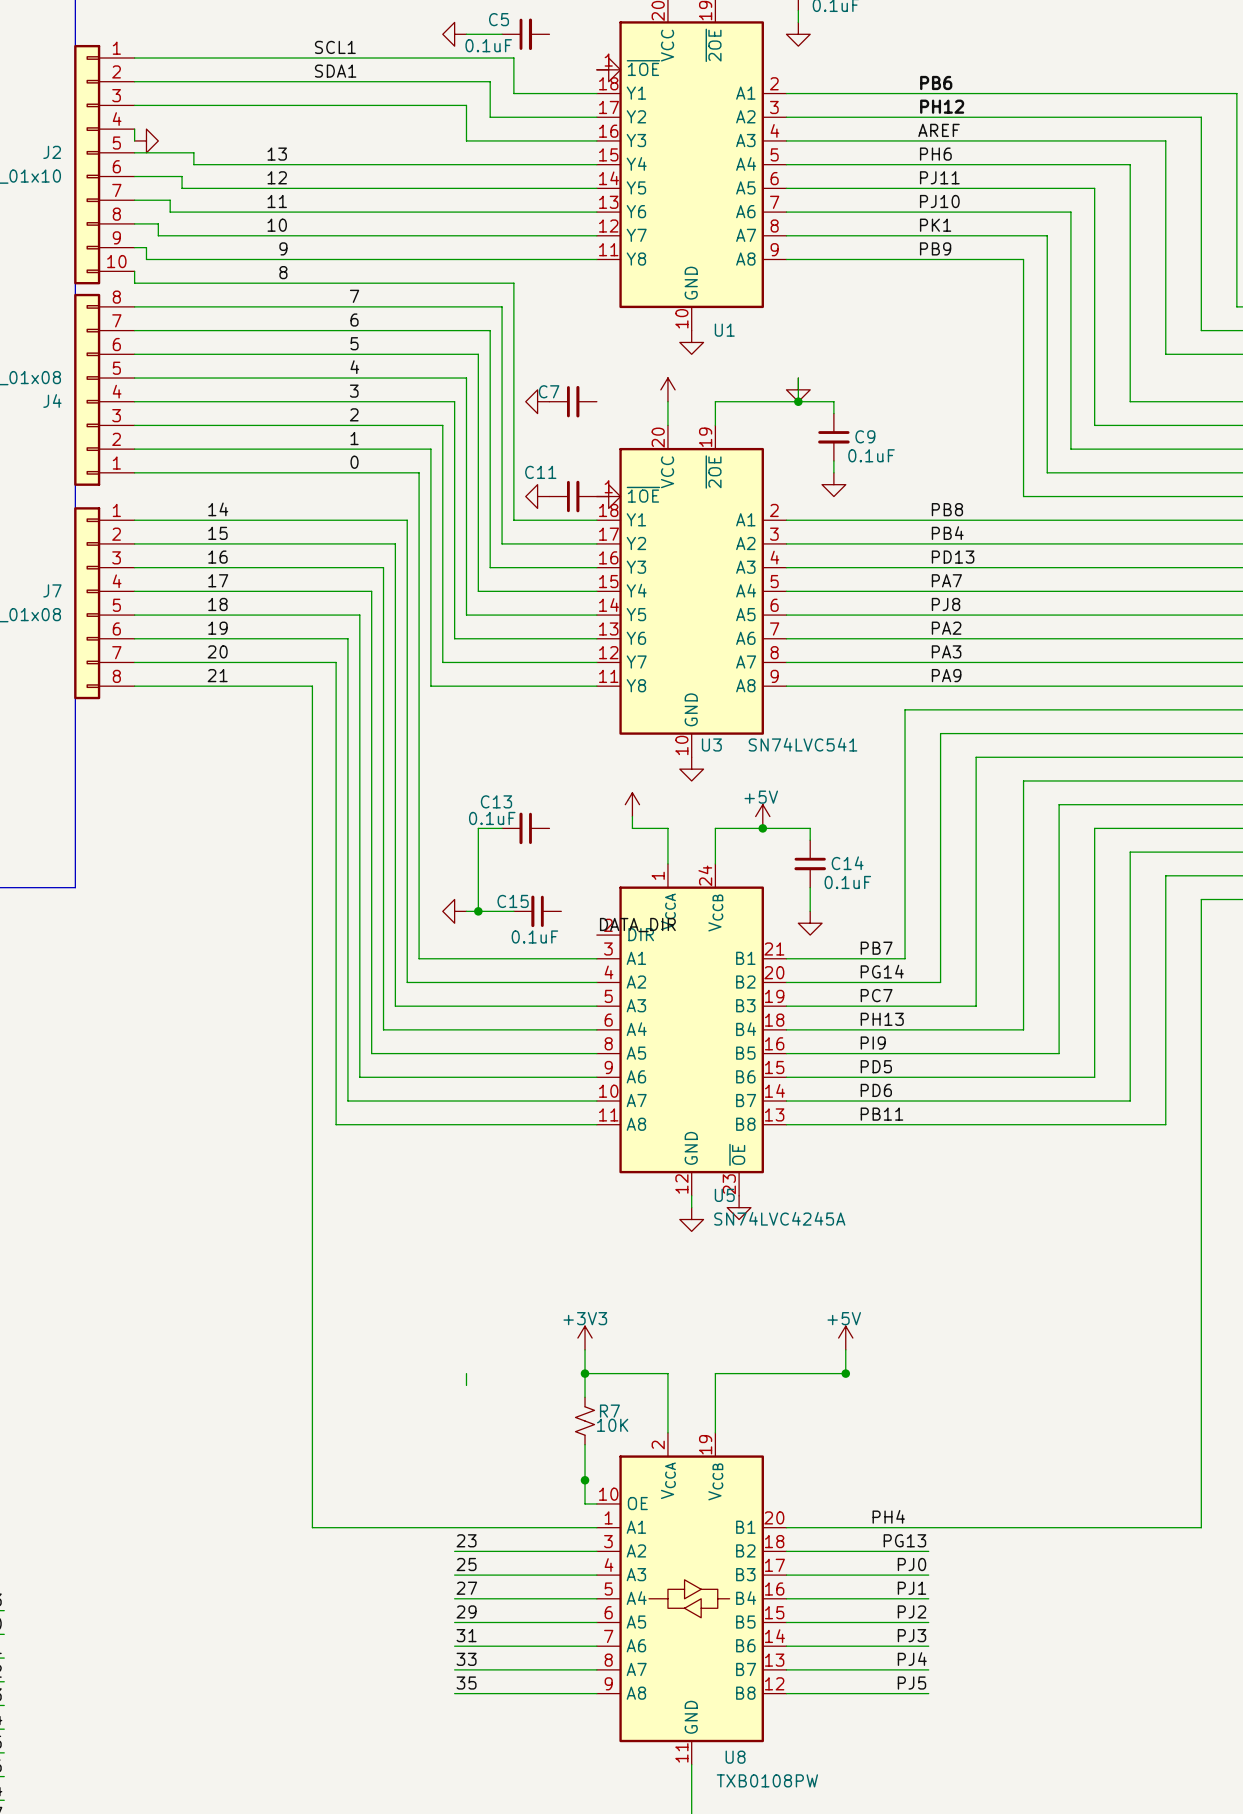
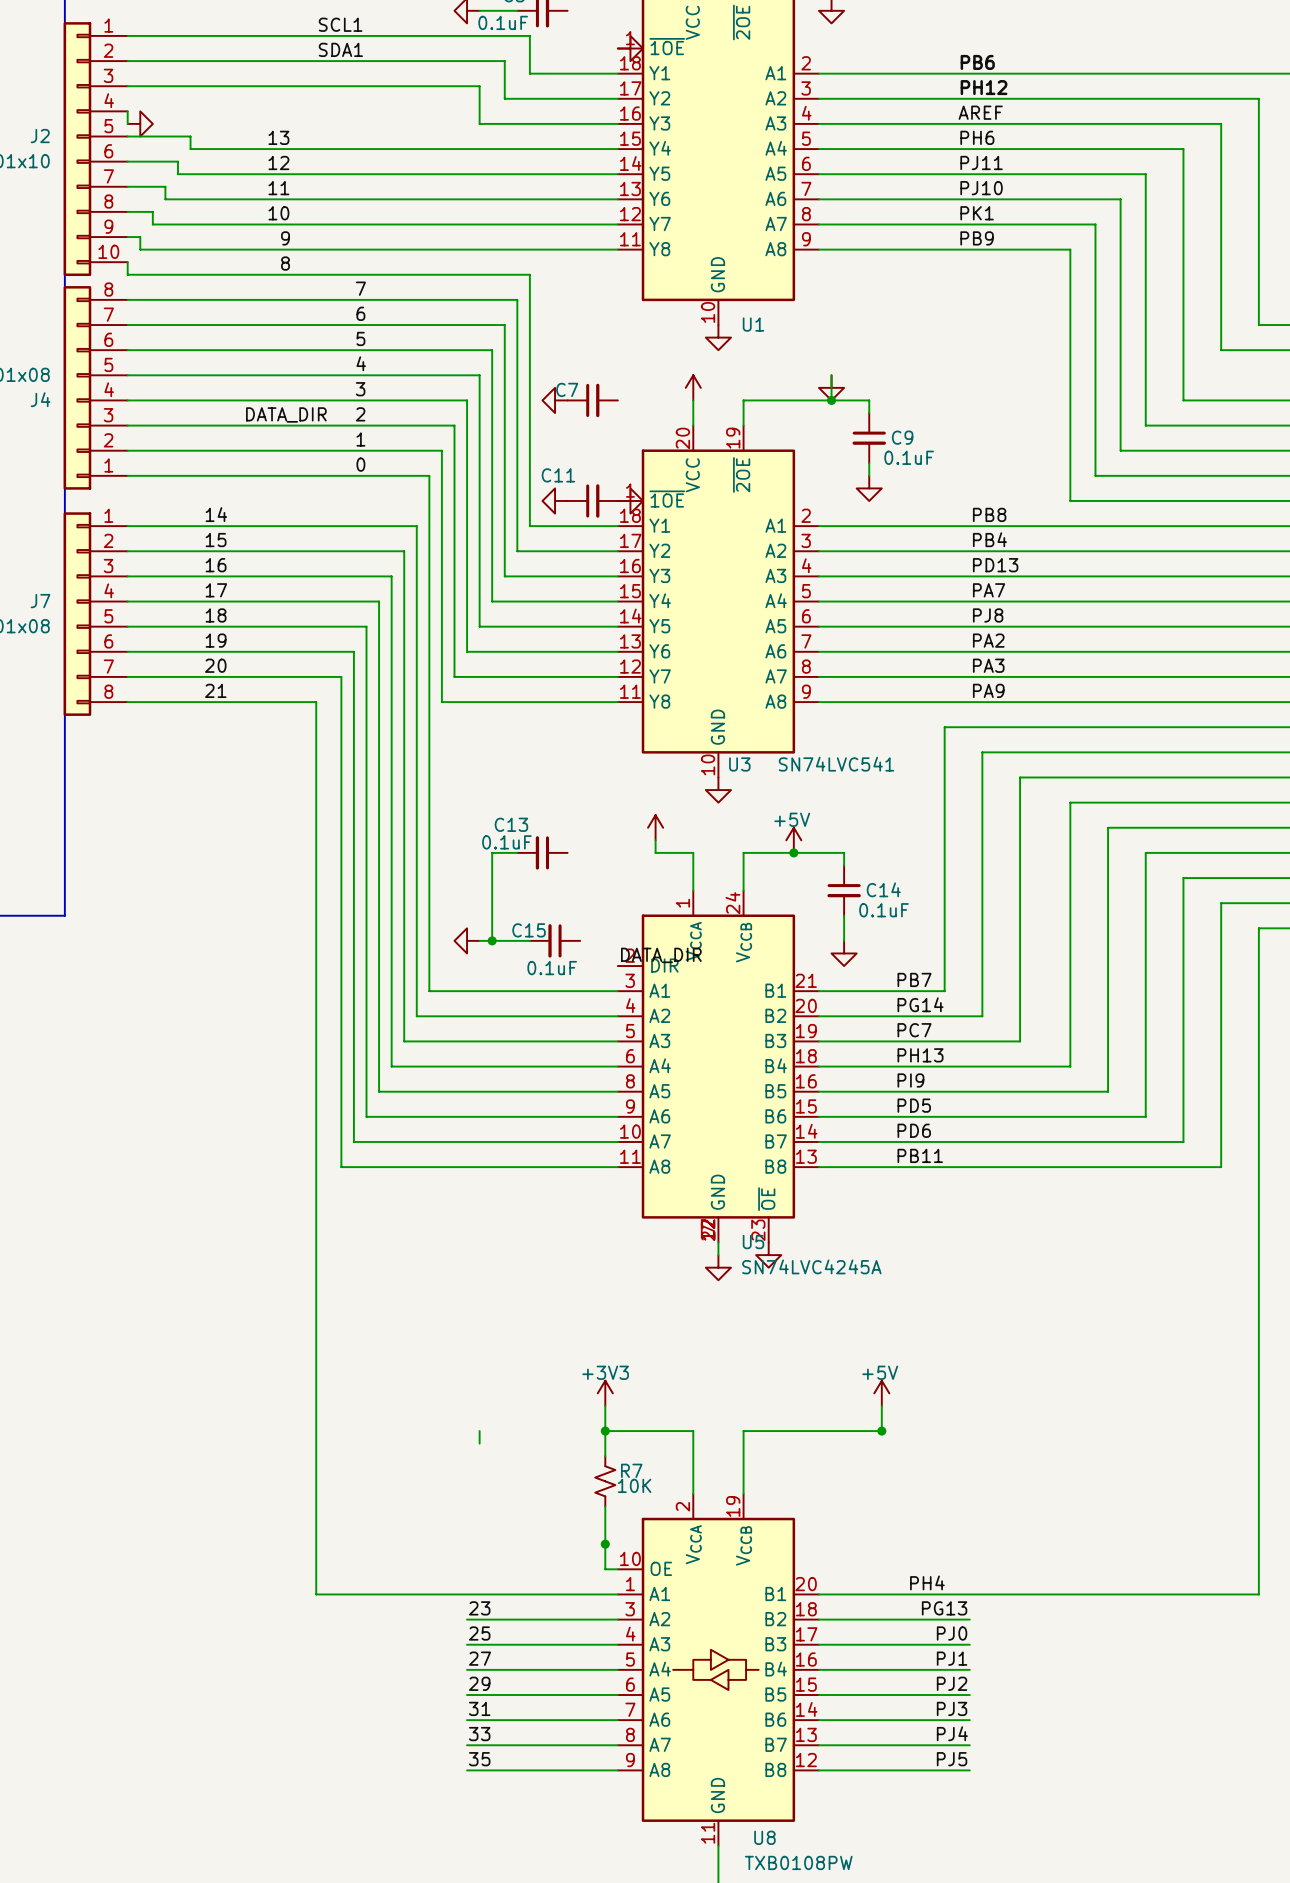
label: none -> DATA_DIR (286, 414)
U5 symbol: [596, 863, 787, 1196] -> [617, 890, 819, 1243]

